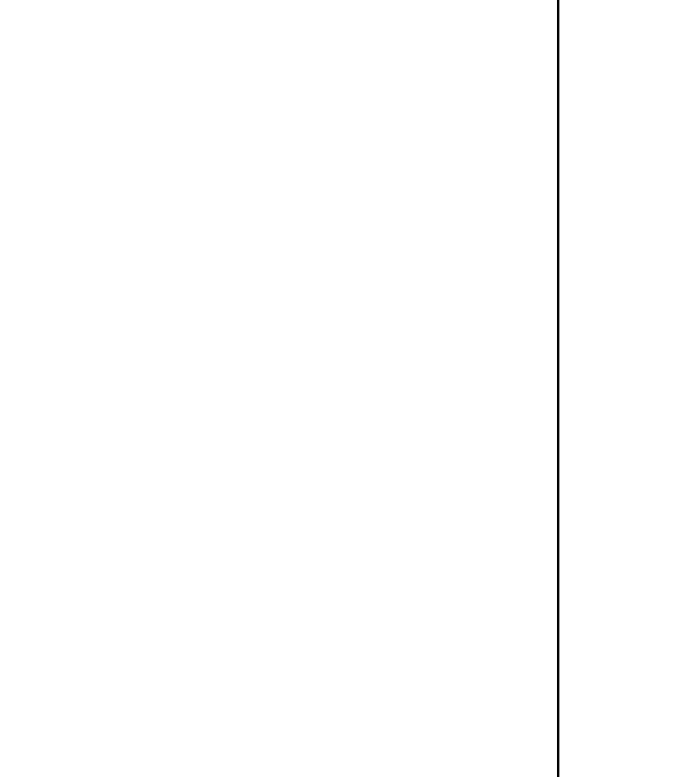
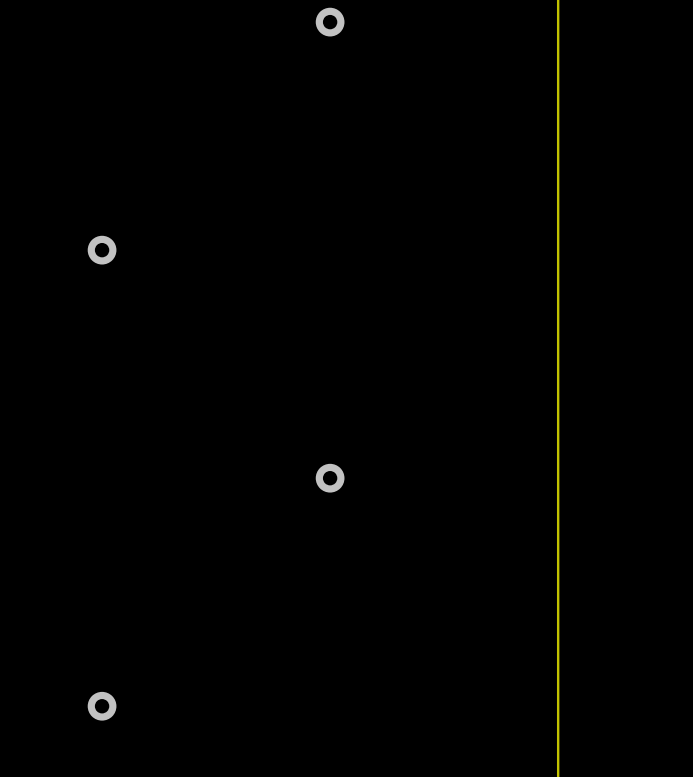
via: none -> (330, 22)
via: none -> (102, 250)
via: none -> (330, 478)
via: none -> (102, 706)

